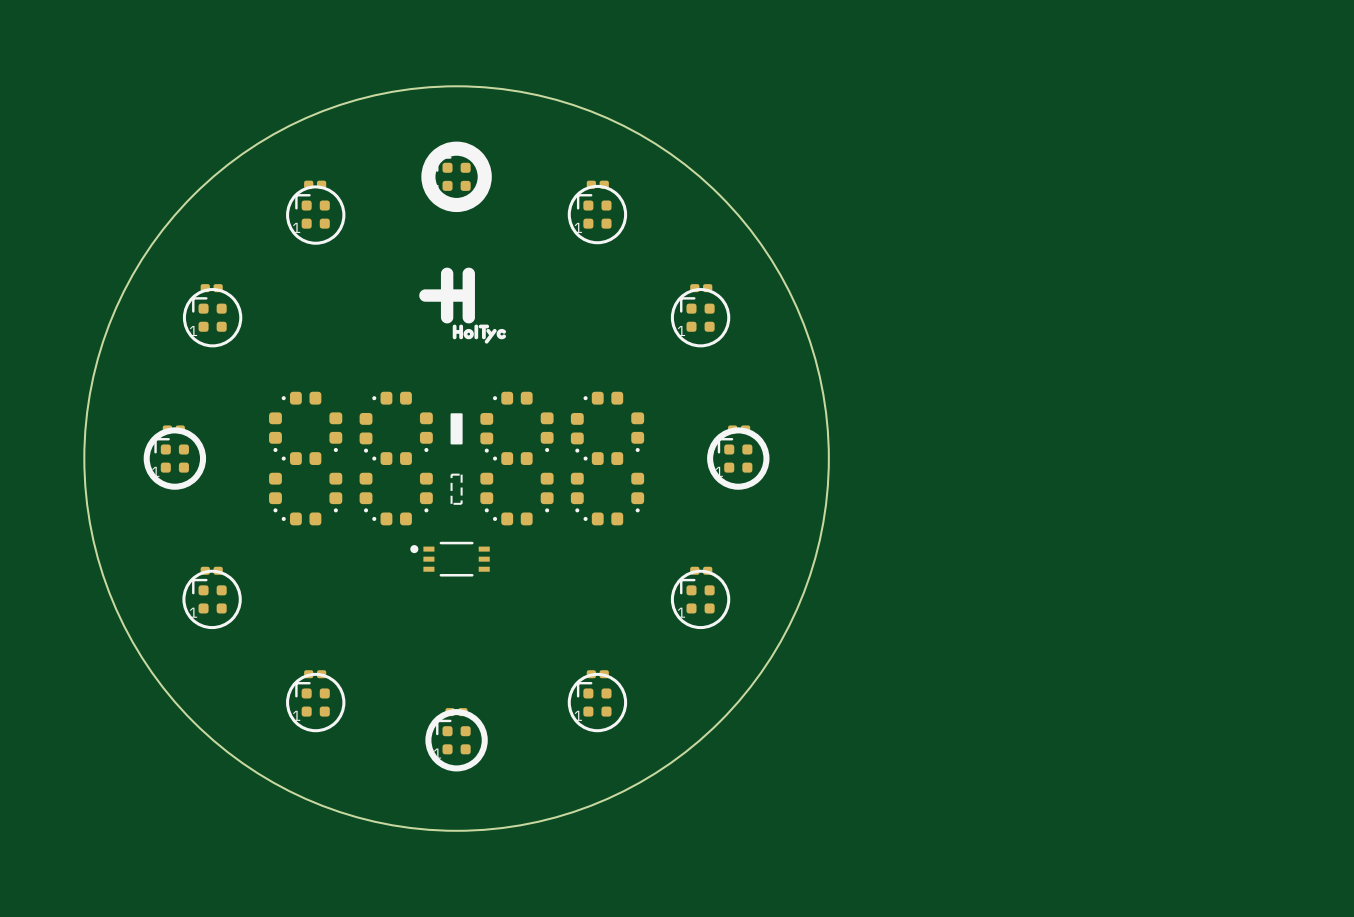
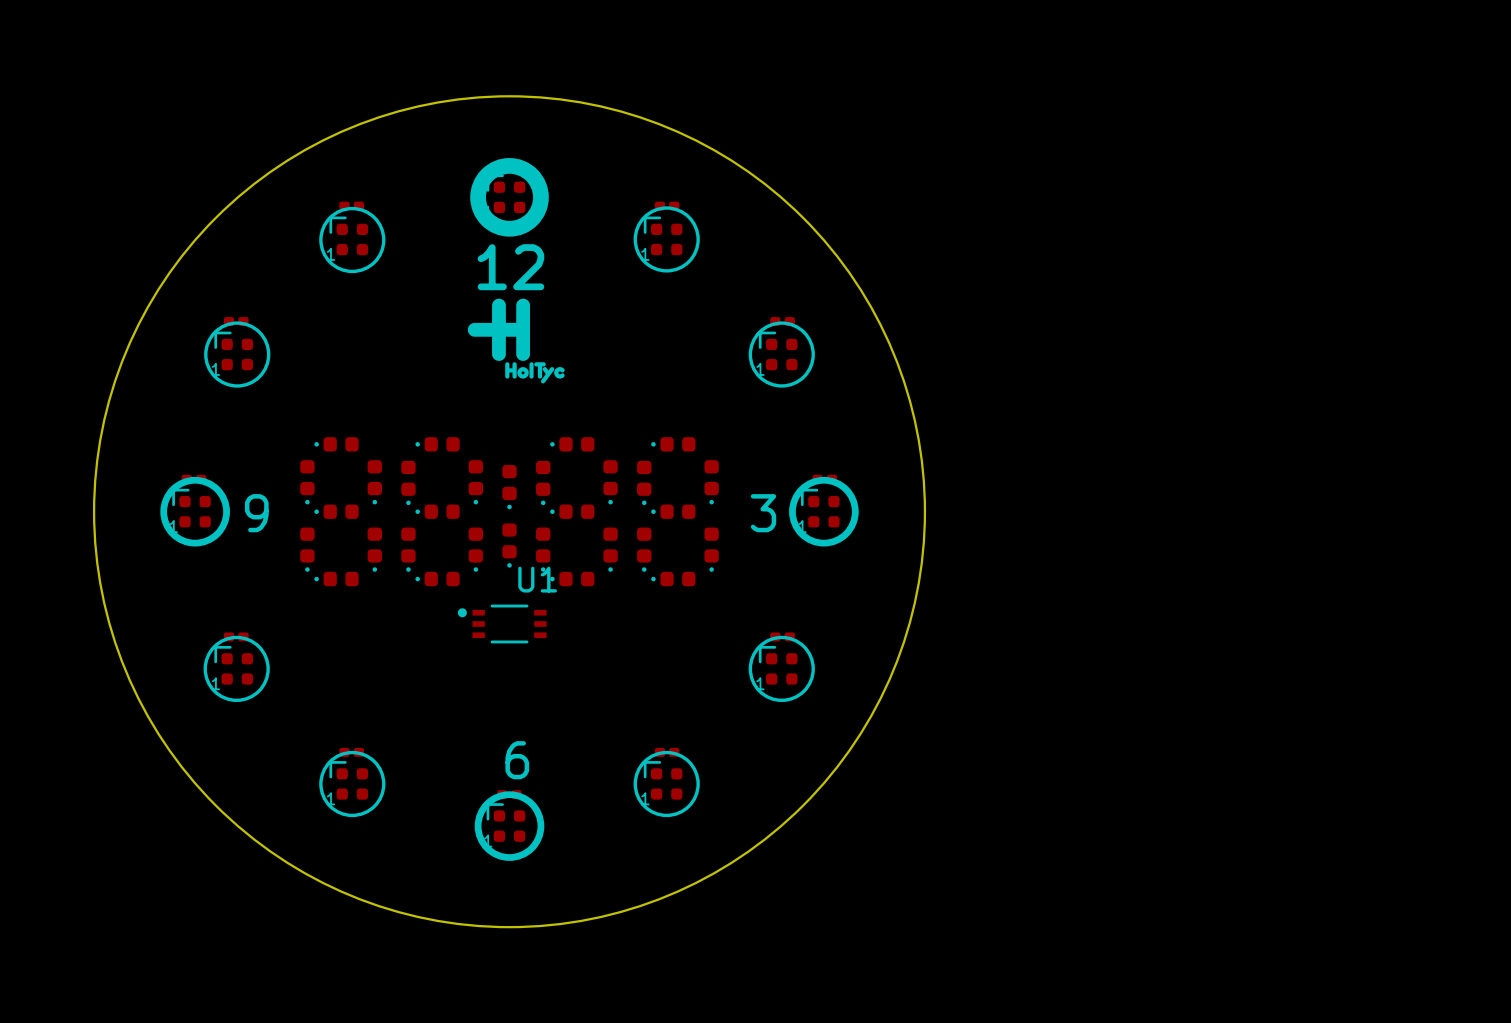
text: none -> 12 (510, 267)
drawing: [450, 413, 463, 445] -> none
part: none -> (509, 487)
text: none -> 9 (256, 513)
text: none -> 3 (763, 513)
line: (451, 474) (461, 474) (461, 503) (451, 503) (451, 474) -> none
part: none -> (509, 545)
U1 name: none -> U1 (537, 579)
text: none -> 6 (517, 760)

